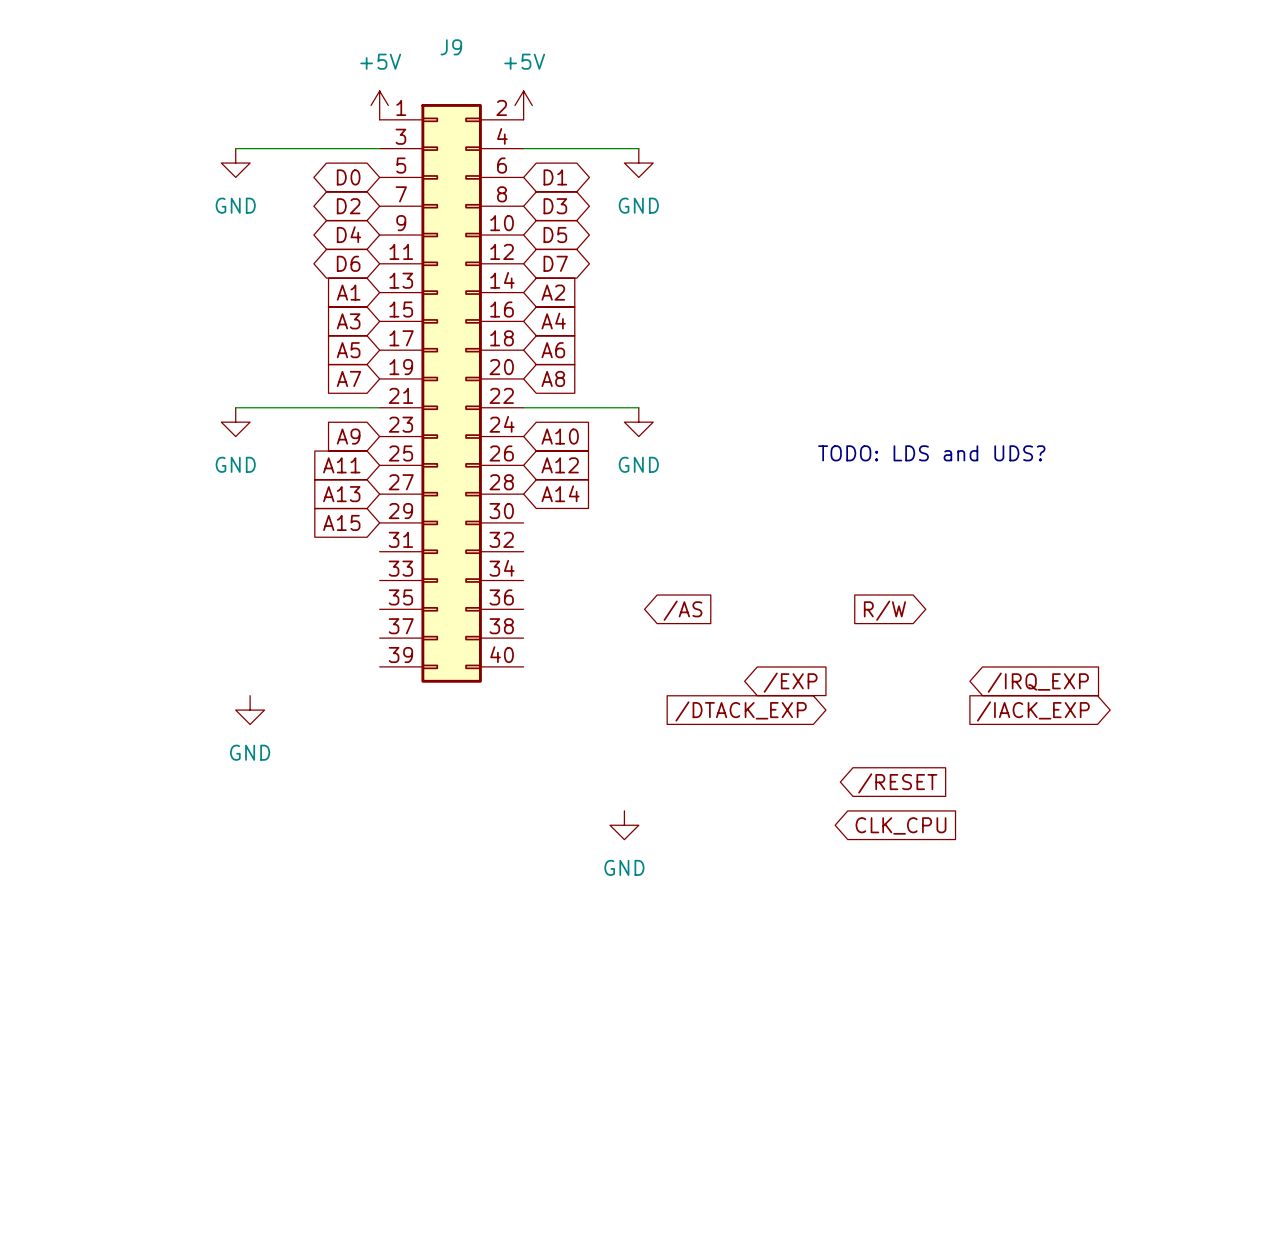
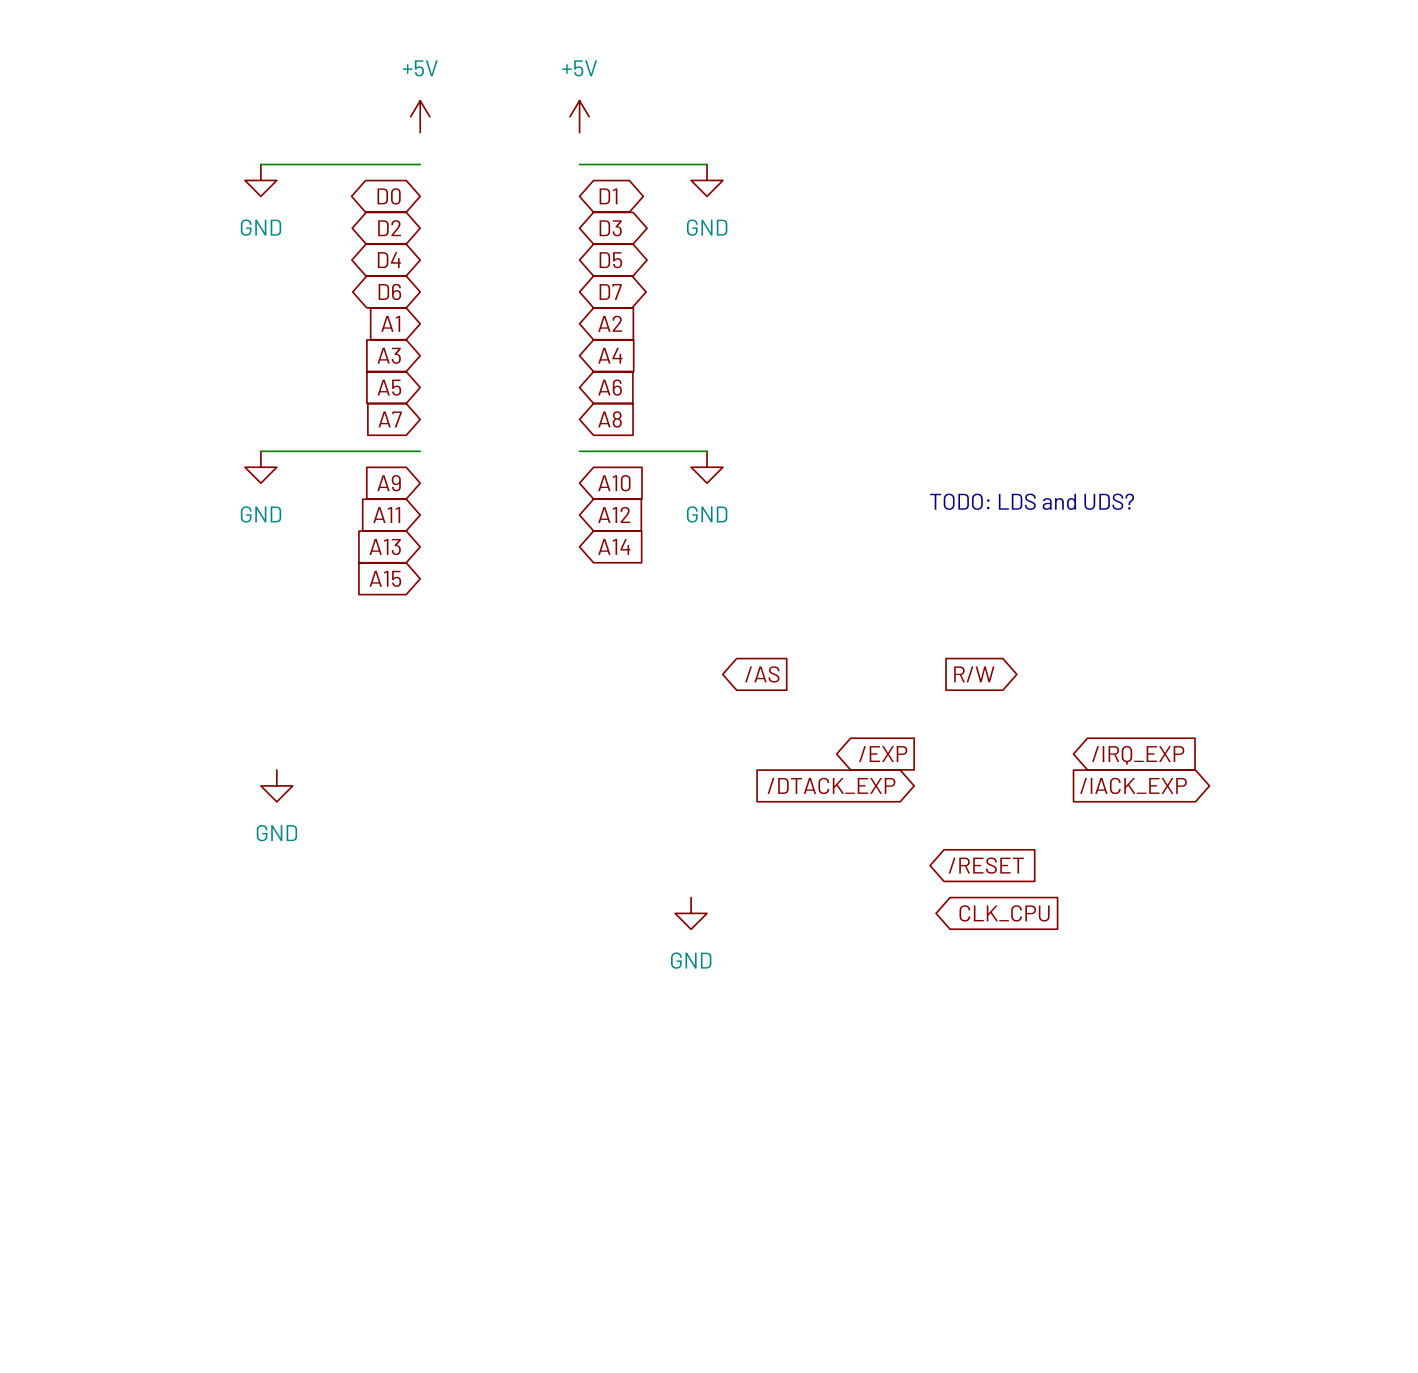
J9: (451, 393) -> none

